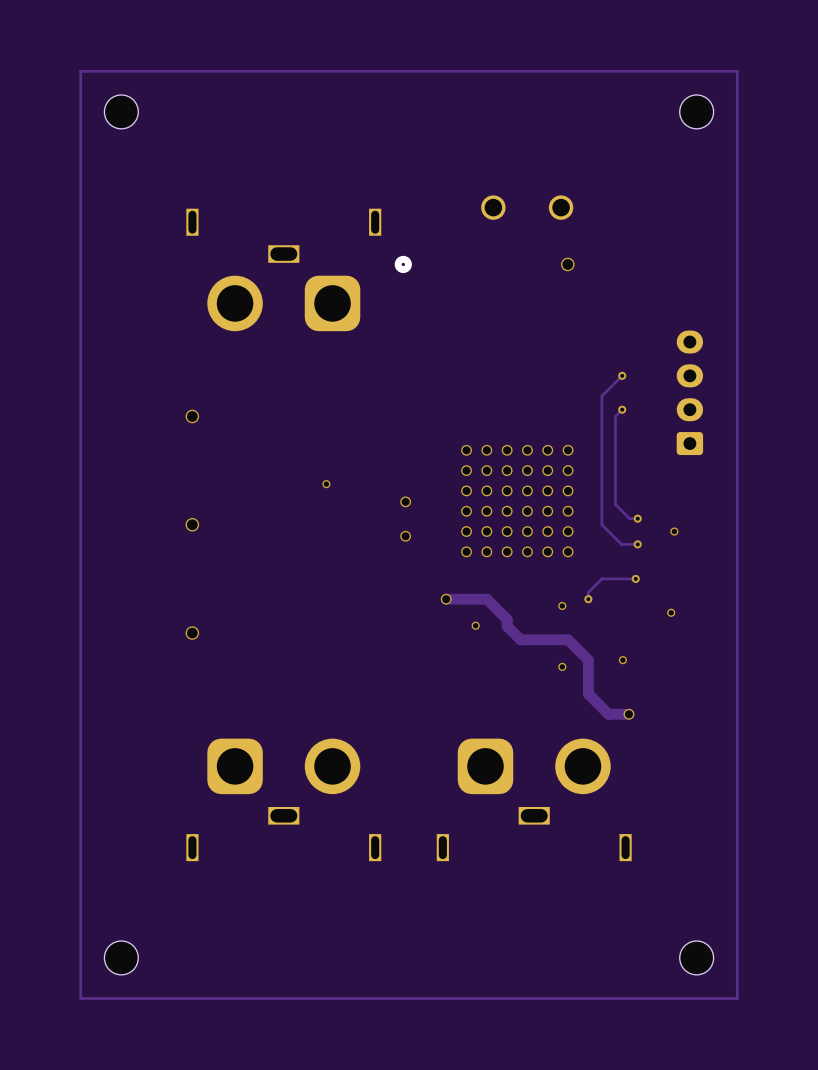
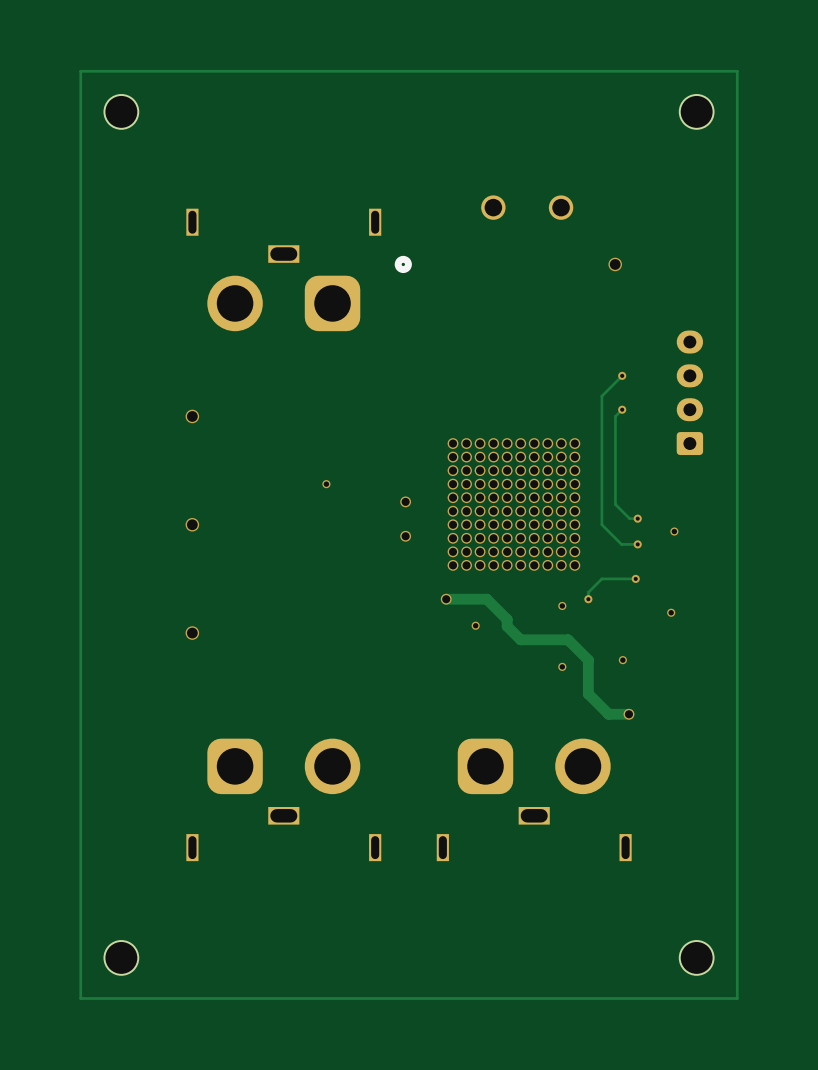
via position: (567, 264) -> (615, 264)
via: none -> (453, 443)
via: none -> (466, 443)
via: none -> (480, 443)
via: none -> (493, 443)
via: none -> (507, 443)
via: none -> (520, 443)
via: none -> (534, 443)
via: none -> (547, 443)
via: none -> (561, 443)
via: none -> (574, 443)
via: (466, 450) -> none
via: (486, 450) -> none
via: (507, 450) -> none
via: (527, 450) -> none
via: (547, 450) -> none
via: (568, 450) -> none
via: none -> (453, 457)
via: none -> (466, 457)
via: none -> (480, 457)
via: none -> (493, 457)
via: none -> (507, 457)
via: none -> (520, 457)
via: none -> (534, 457)
via: none -> (547, 457)
via: none -> (561, 457)
via: none -> (574, 457)
via: none -> (453, 470)
via: none -> (480, 470)
via: (486, 470) -> none
via: none -> (493, 470)
via: none -> (520, 470)
via: (527, 470) -> none
via: none -> (534, 470)
via: none -> (561, 470)
via: (568, 470) -> none
via: none -> (574, 470)
via: none -> (453, 484)
via: none -> (466, 484)
via: none -> (480, 484)
via: none -> (493, 484)
via: none -> (507, 484)
via: none -> (520, 484)
via: none -> (534, 484)
via: none -> (547, 484)
via: none -> (561, 484)
via: none -> (574, 484)
via: (466, 490) -> none
via: (486, 490) -> none
via: (507, 490) -> none
via: (527, 490) -> none
via: (547, 490) -> none
via: (568, 490) -> none
via: none -> (453, 497)
via: none -> (466, 497)
via: none -> (480, 497)
via: none -> (493, 497)
via: none -> (507, 497)
via: none -> (520, 497)
via: none -> (534, 497)
via: none -> (547, 497)
via: none -> (561, 497)
via: none -> (574, 497)
via: none -> (453, 511)
via: none -> (480, 511)
via: (486, 511) -> none
via: none -> (493, 511)
via: none -> (520, 511)
via: (527, 511) -> none
via: none -> (534, 511)
via: none -> (561, 511)
via: (568, 511) -> none
via: none -> (574, 511)
via: none -> (453, 524)
via: none -> (466, 524)
via: none -> (480, 524)
via: none -> (493, 524)
via: none -> (507, 524)
via: none -> (520, 524)
via: none -> (534, 524)
via: none -> (547, 524)
via: none -> (561, 524)
via: none -> (574, 524)
via: (466, 531) -> none
via: (486, 531) -> none
via: (507, 531) -> none
via: (527, 531) -> none
via: (547, 531) -> none
via: (568, 531) -> none
via: none -> (453, 538)
via: none -> (466, 538)
via: none -> (480, 538)
via: none -> (493, 538)
via: none -> (507, 538)
via: none -> (520, 538)
via: none -> (534, 538)
via: none -> (547, 538)
via: none -> (561, 538)
via: none -> (574, 538)
via: none -> (453, 551)
via: none -> (480, 551)
via: (486, 551) -> none
via: none -> (493, 551)
via: none -> (520, 551)
via: (527, 551) -> none
via: none -> (534, 551)
via: none -> (561, 551)
via: (568, 551) -> none
via: none -> (574, 551)
via: none -> (453, 565)
via: none -> (466, 565)
via: none -> (480, 565)
via: none -> (493, 565)
via: none -> (507, 565)
via: none -> (520, 565)
via: none -> (534, 565)
via: none -> (547, 565)
via: none -> (561, 565)
via: none -> (574, 565)

